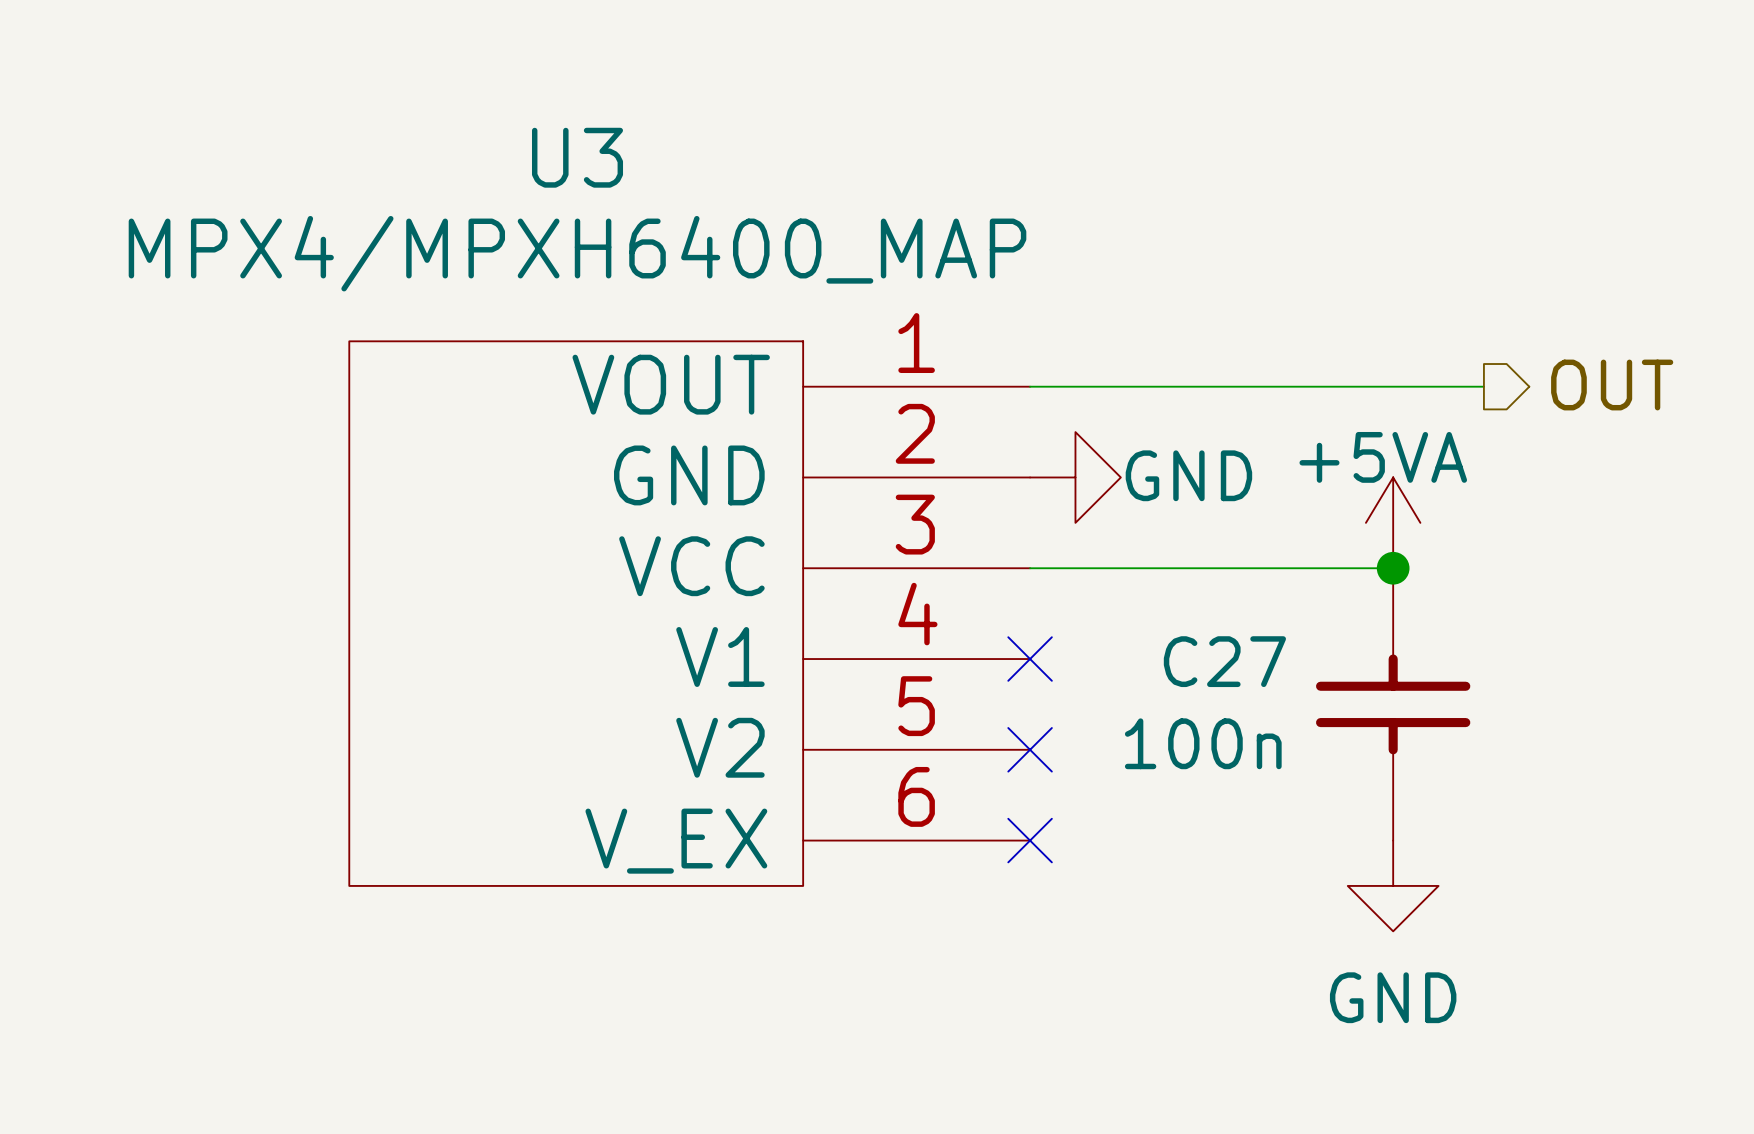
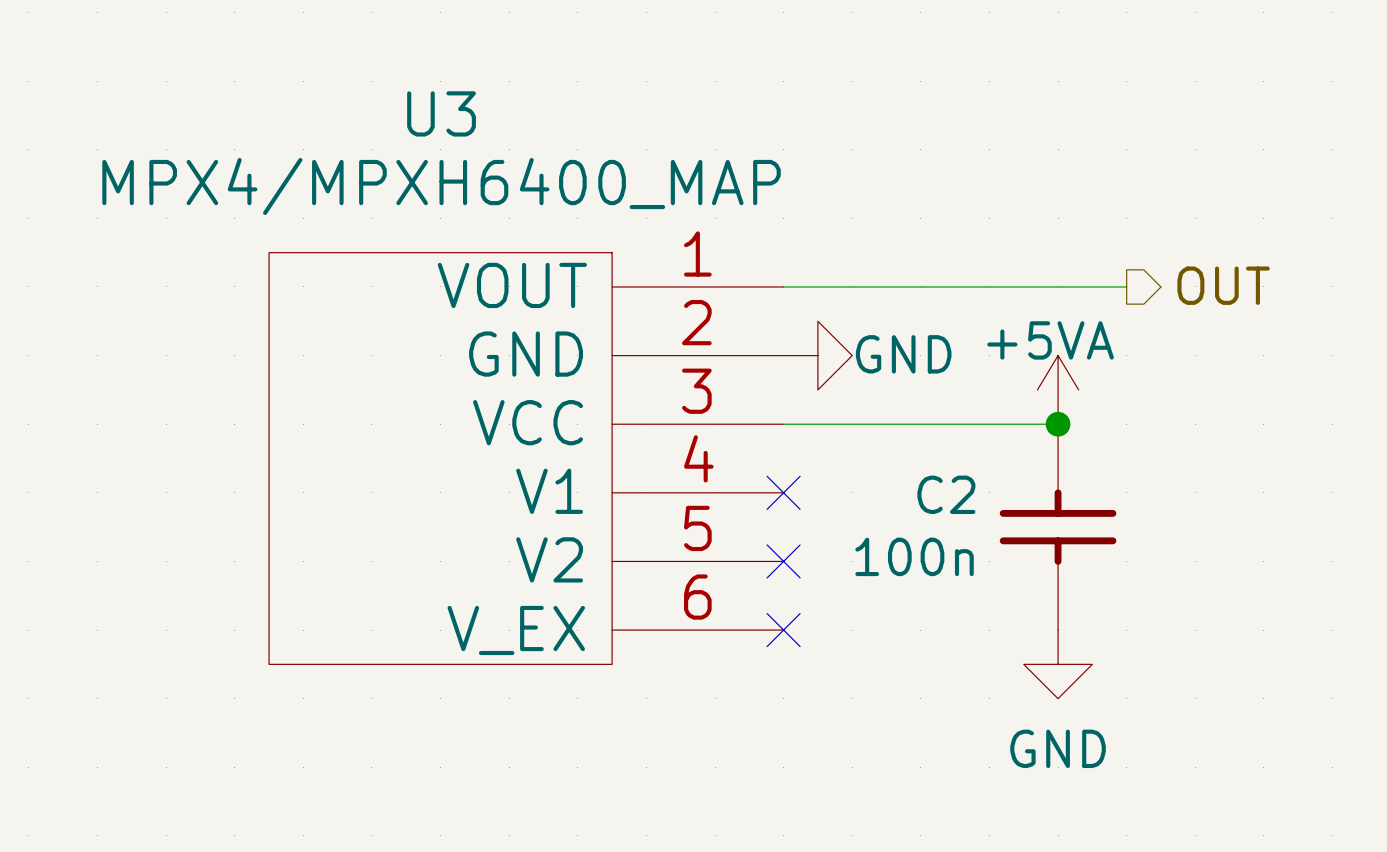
C27 name: C27 (1224, 661) -> C2 (946, 494)

